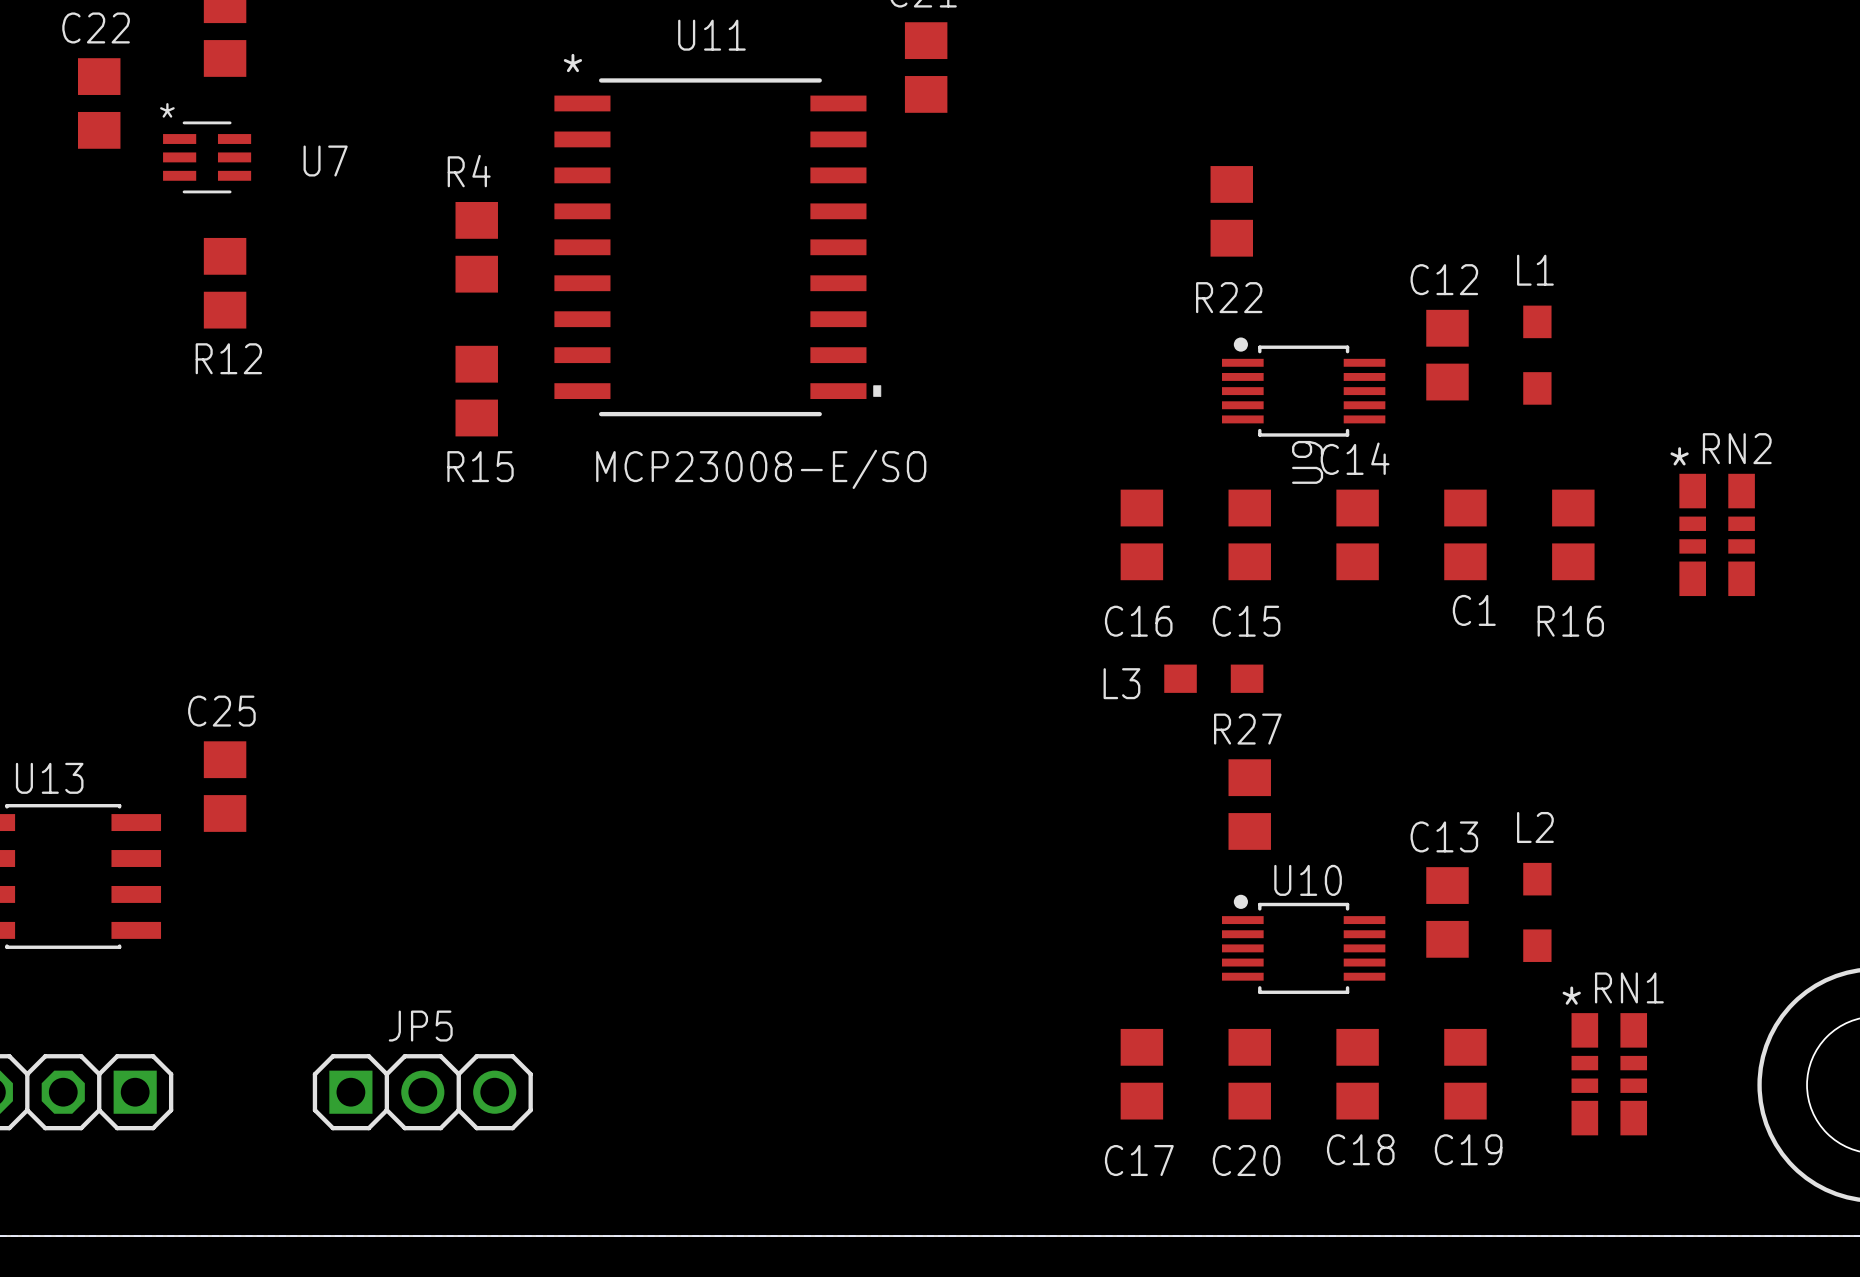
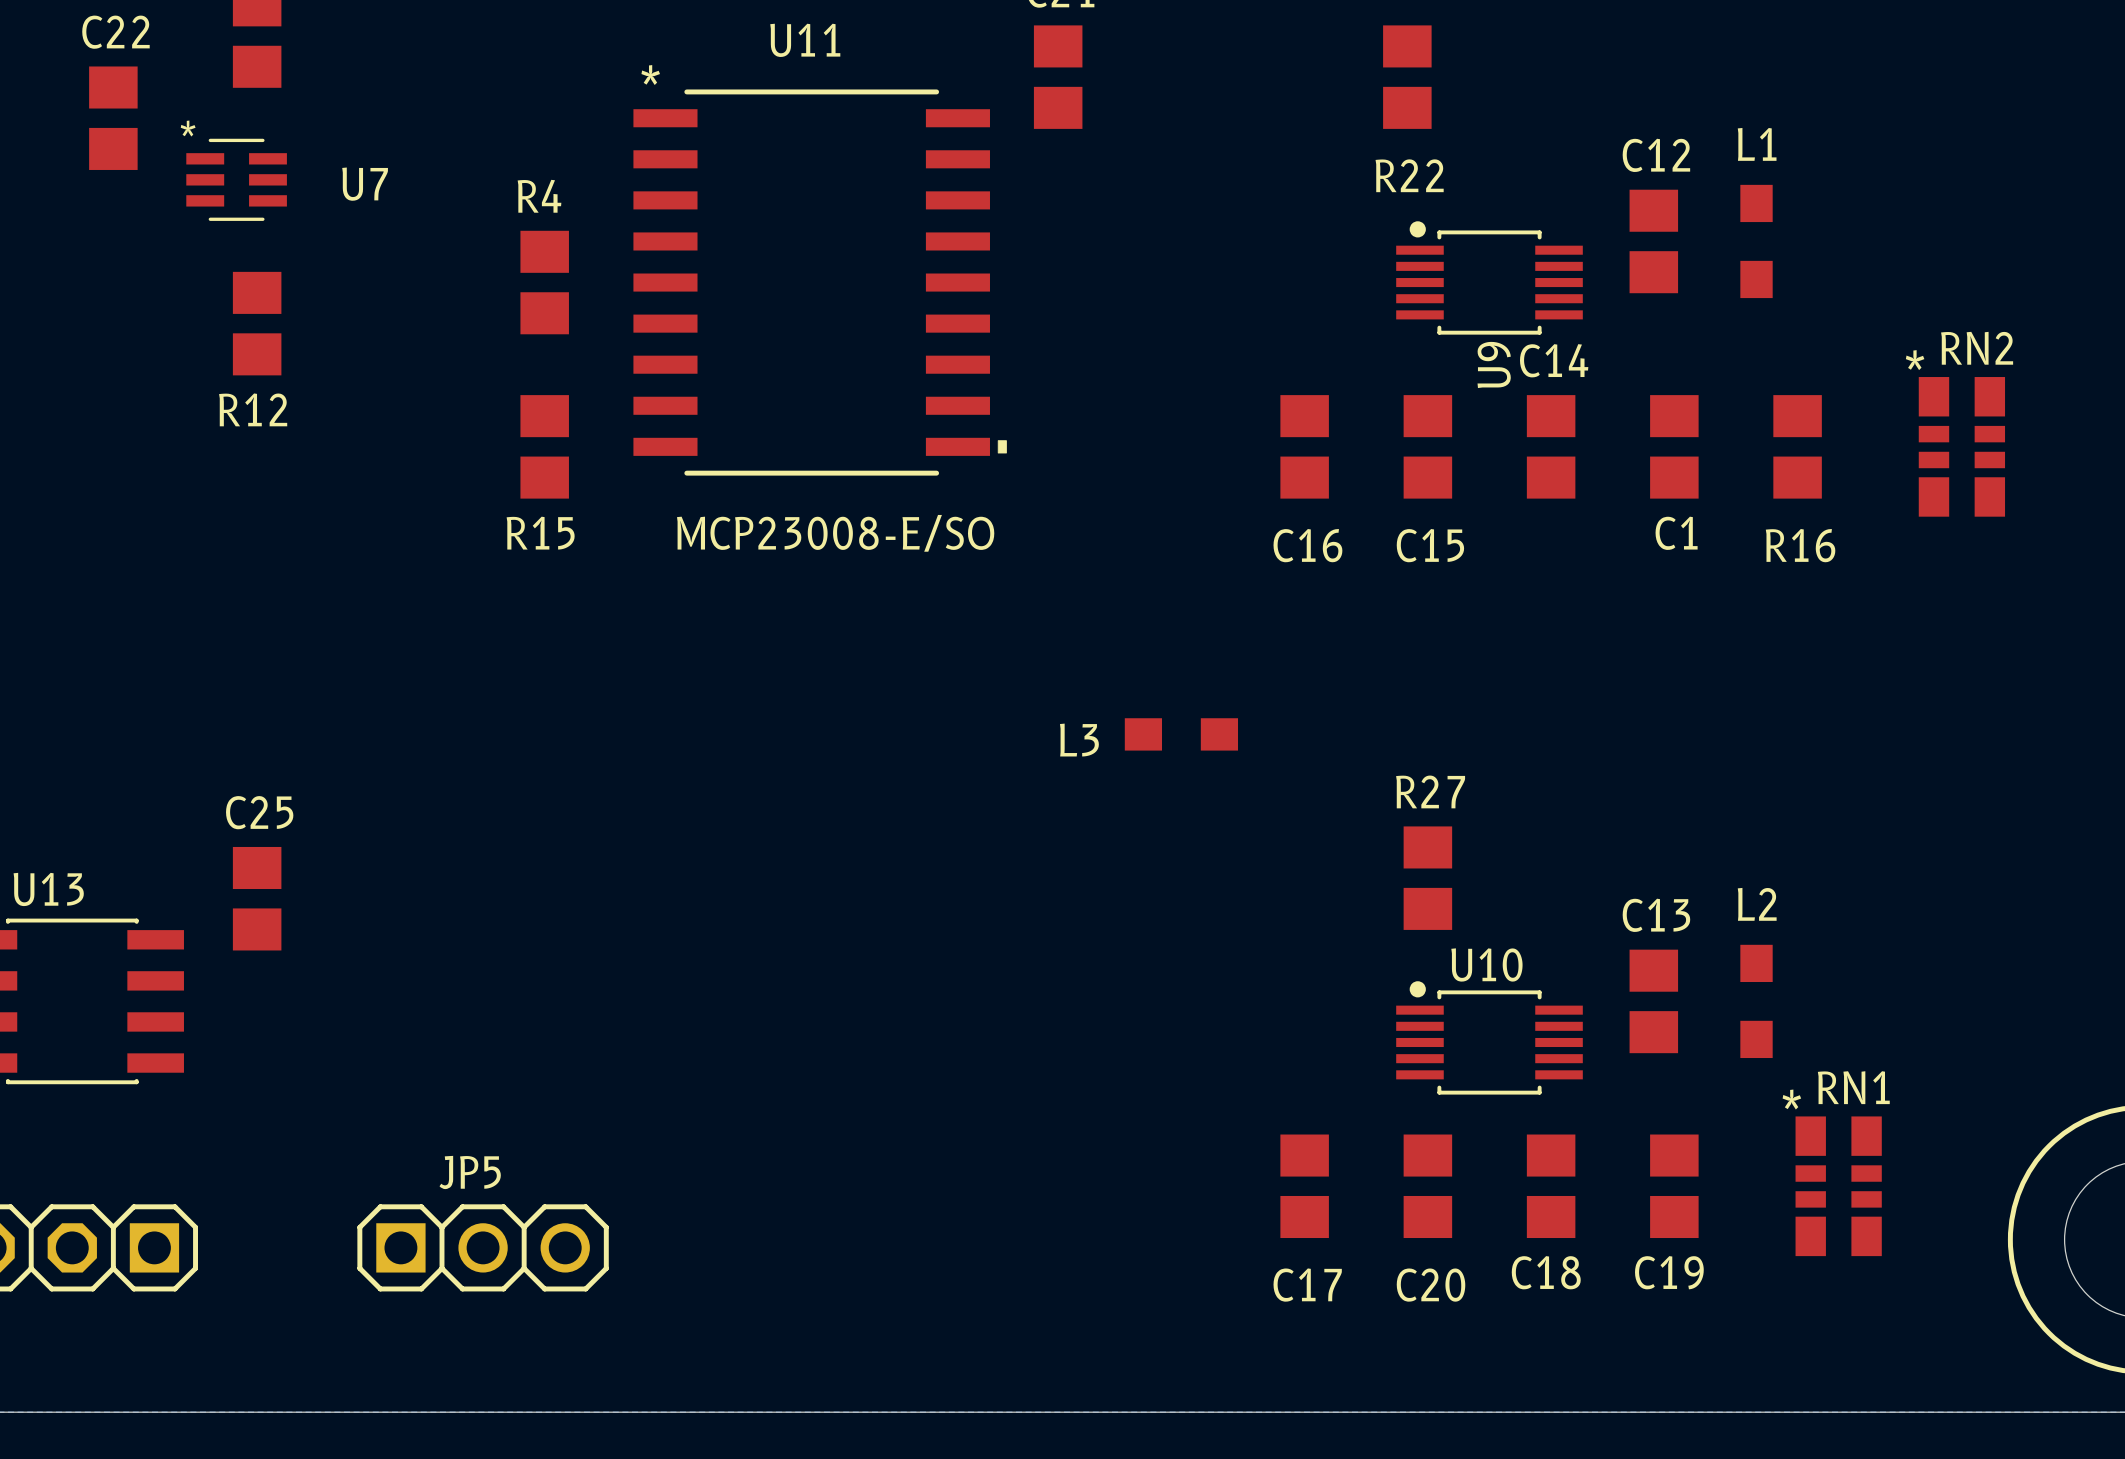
R22 position: (1231, 211) -> (1407, 77)
C12 position: (1447, 355) -> (1653, 241)
L1 position: (1537, 355) -> (1756, 241)
U9 position: (1303, 387) -> (1489, 277)
C16 position: (1141, 534) -> (1304, 446)
C15 position: (1249, 534) -> (1427, 446)
C14 position: (1357, 534) -> (1551, 446)
C1 position: (1465, 534) -> (1674, 446)
R16 position: (1573, 534) -> (1797, 446)
RN2 position: (1717, 534) -> (1961, 446)
L3 position: (1213, 678) -> (1181, 734)
R27 position: (1249, 804) -> (1427, 878)
C13 position: (1447, 912) -> (1653, 1001)
L2 position: (1537, 912) -> (1756, 1001)
U10 position: (1303, 944) -> (1489, 1037)
C17 position: (1141, 1074) -> (1304, 1186)
C20 position: (1249, 1074) -> (1427, 1186)
C18 position: (1357, 1074) -> (1551, 1186)
C19 position: (1465, 1074) -> (1674, 1186)
RN1 position: (1609, 1074) -> (1838, 1186)

